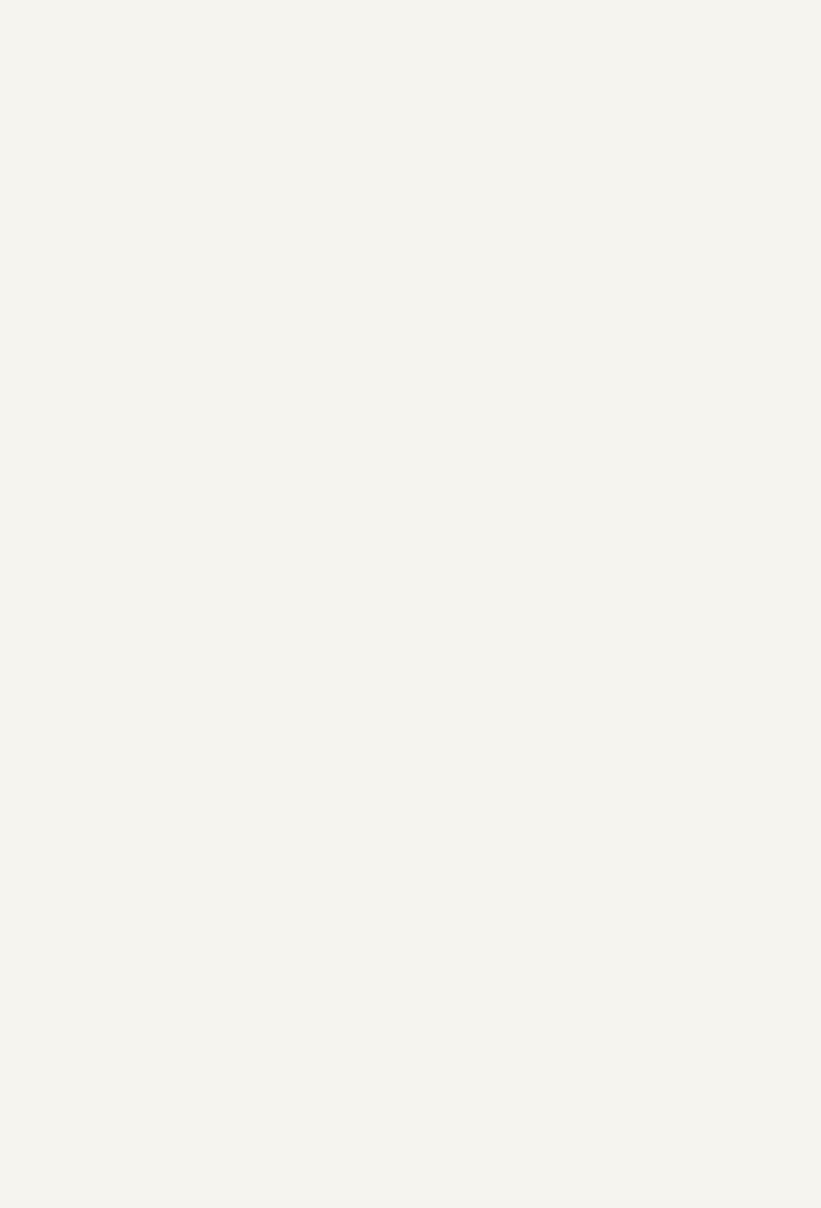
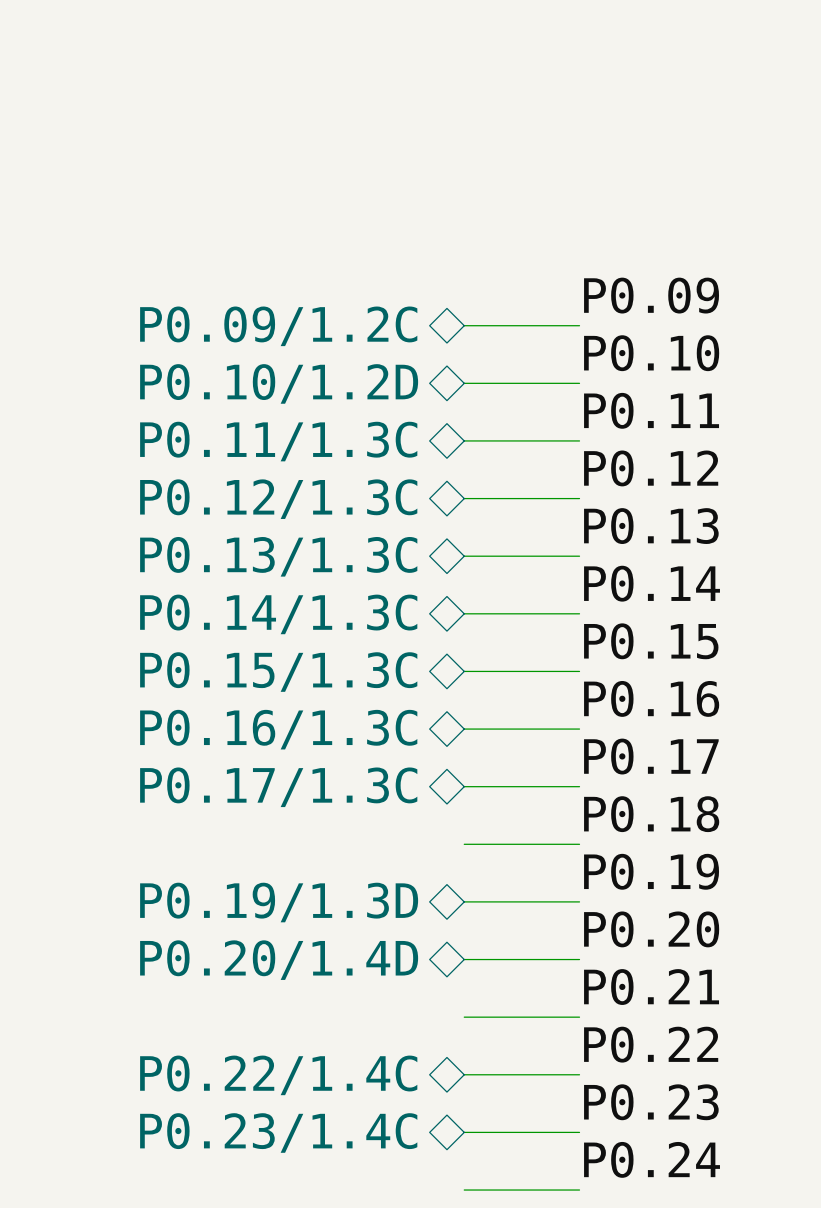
label: none -> P0.09 (651, 295)
wire: none -> (464, 325) (579, 325)
sheet pin: none -> P0.09/1.2C (278, 326)
label: none -> P0.10 (651, 353)
sheet pin: none -> P0.10/1.2D (279, 383)
wire: none -> (464, 383) (579, 383)
label: none -> P0.11 (651, 410)
wire: none -> (464, 440) (579, 440)
sheet pin: none -> P0.11/1.3C (278, 441)
label: none -> P0.12 (651, 468)
wire: none -> (464, 498) (579, 498)
sheet pin: none -> P0.12/1.3C (278, 499)
label: none -> P0.13 (651, 526)
sheet pin: none -> P0.13/1.3C (278, 556)
wire: none -> (464, 556) (579, 556)
label: none -> P0.14 (652, 583)
wire: none -> (464, 613) (579, 613)
sheet pin: none -> P0.14/1.3C (278, 614)
label: none -> P0.15 (651, 641)
wire: none -> (464, 671) (579, 671)
sheet pin: none -> P0.15/1.3C (278, 672)
label: none -> P0.16 (651, 698)
sheet pin: none -> P0.16/1.3C (278, 729)
wire: none -> (464, 729) (579, 729)
label: none -> P0.17 (651, 756)
wire: none -> (464, 786) (579, 786)
sheet pin: none -> P0.17/1.3C (278, 787)
label: none -> P0.18 (651, 814)
wire: none -> (464, 844) (579, 844)
label: none -> P0.19 (651, 871)
wire: none -> (464, 901) (579, 901)
sheet pin: none -> P0.19/1.3D (279, 902)
label: none -> P0.20 (651, 929)
wire: none -> (464, 959) (579, 959)
sheet pin: none -> P0.20/1.4D (279, 960)
label: none -> P0.21 (651, 987)
wire: none -> (464, 1017) (579, 1017)
label: none -> P0.22 (651, 1044)
wire: none -> (464, 1074) (579, 1074)
sheet pin: none -> P0.22/1.4C (278, 1075)
label: none -> P0.23 (651, 1102)
sheet pin: none -> P0.23/1.4C (278, 1132)
wire: none -> (464, 1132) (579, 1132)
label: none -> P0.24 (652, 1159)
wire: none -> (464, 1190) (579, 1190)

